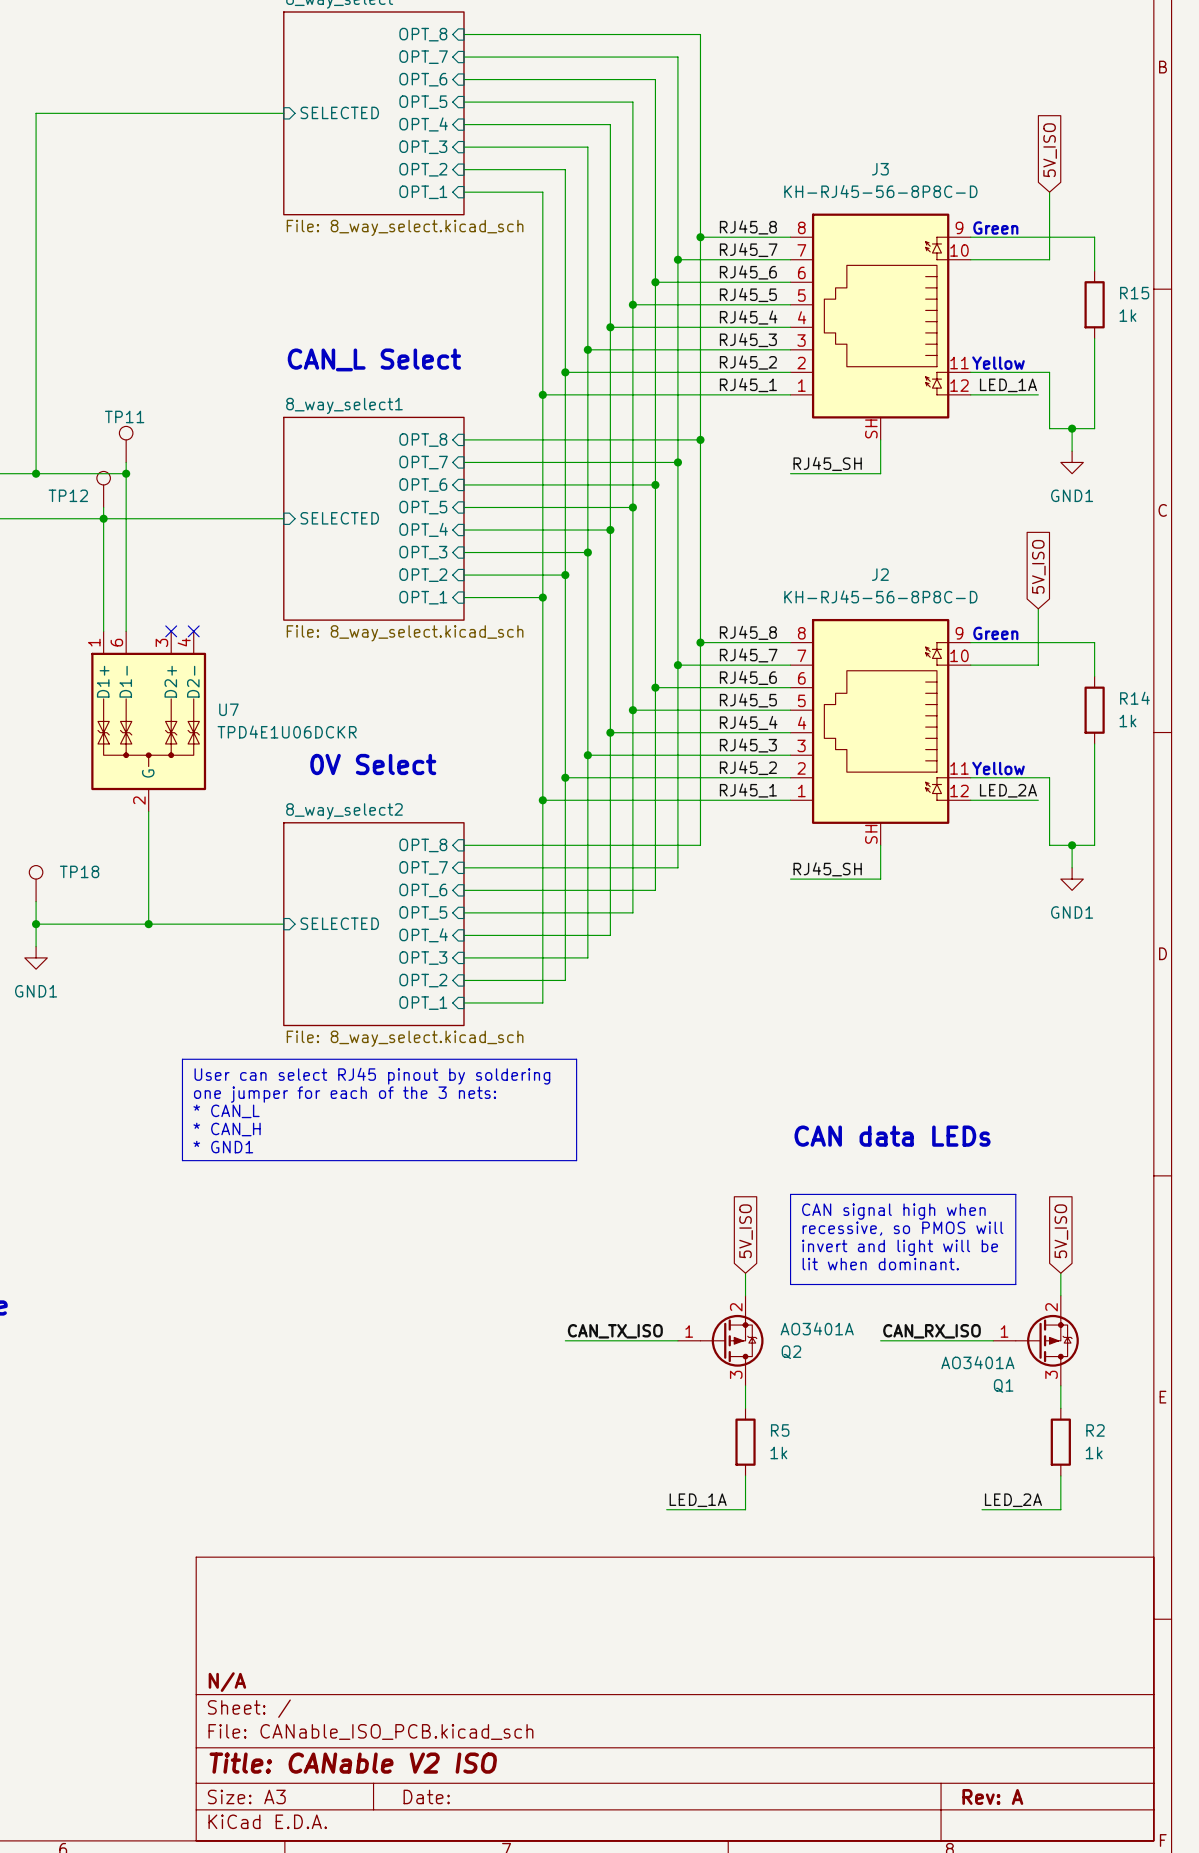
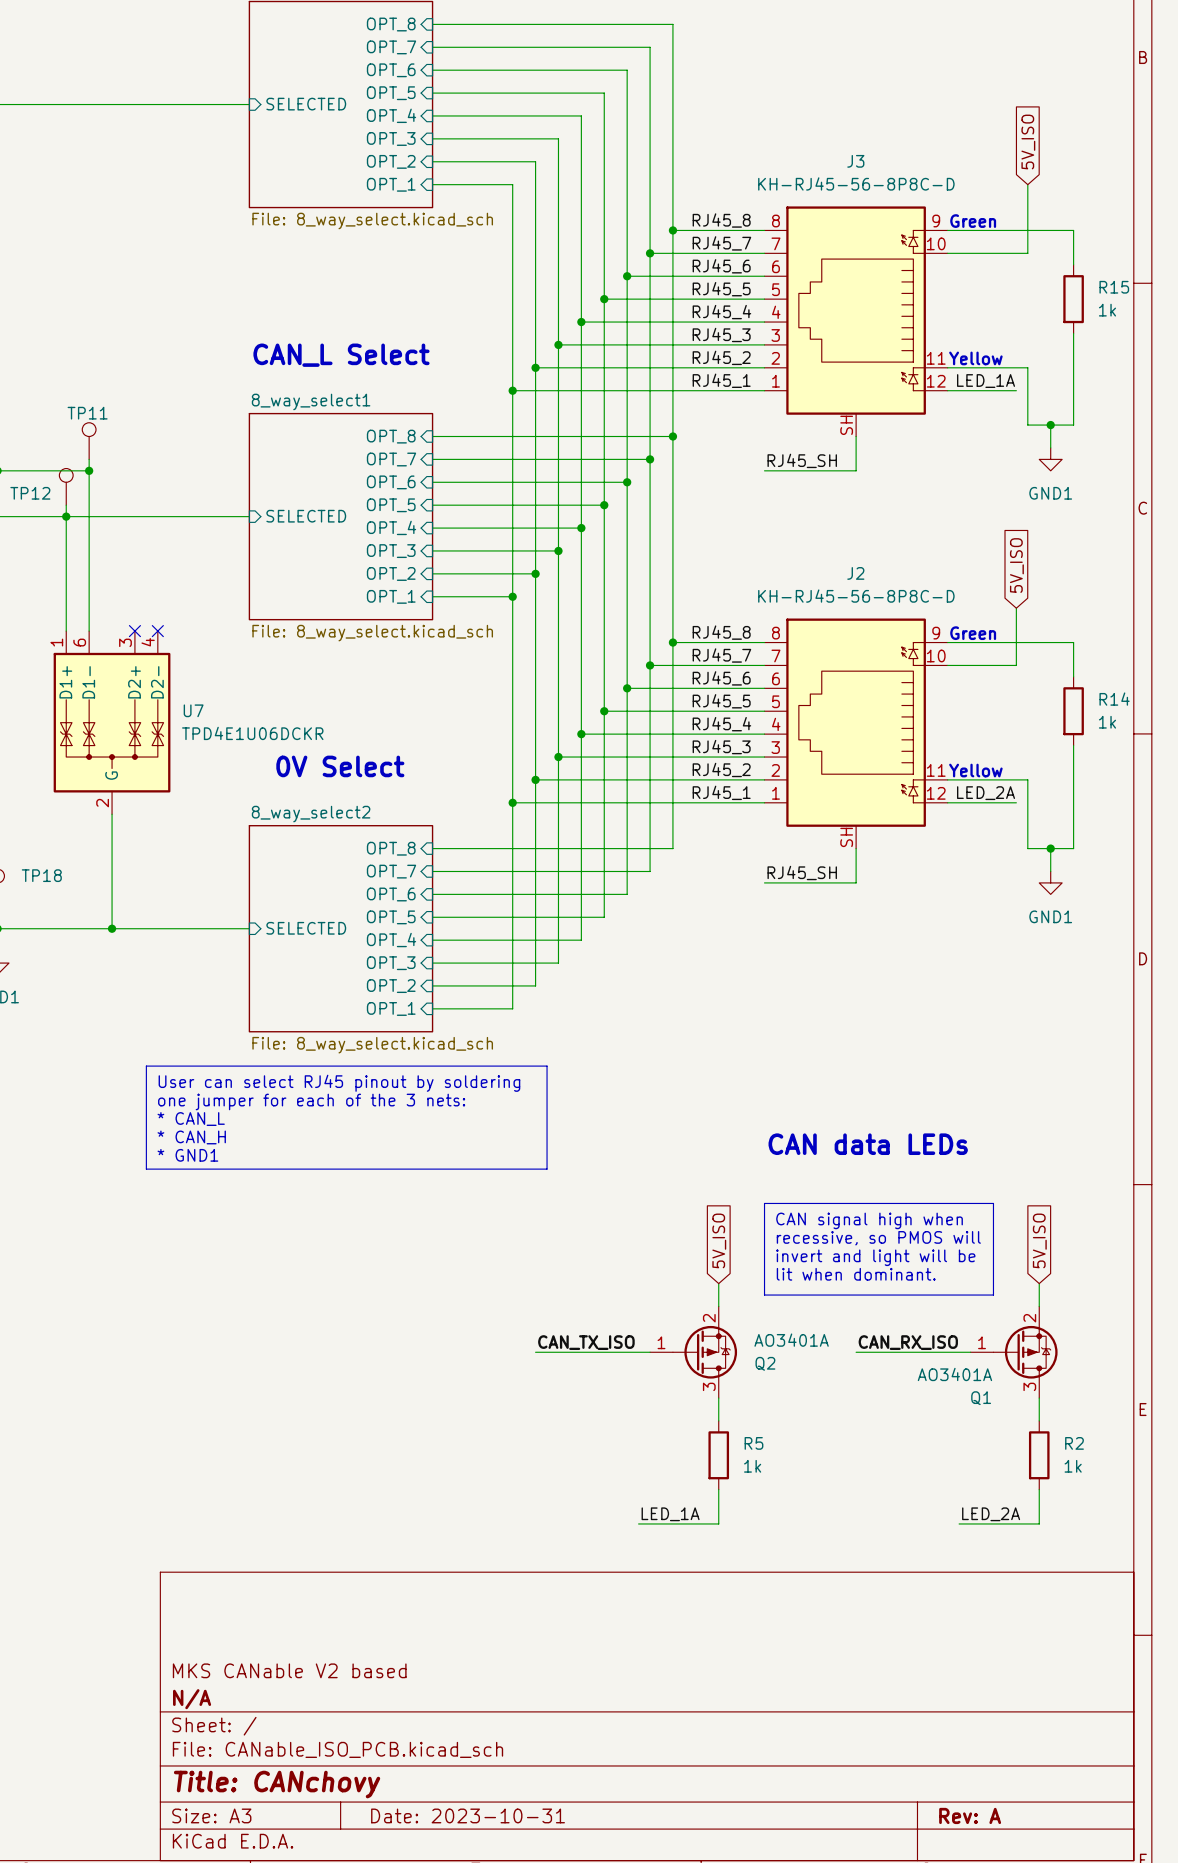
title block: none -> MKS CANable V2 based (289, 1670)
title block: Title: CANable V2 ISO (353, 1763) -> Title: CANchovy (277, 1784)
title block: Date: (426, 1796) -> Date: 2023-10-31 (468, 1815)

